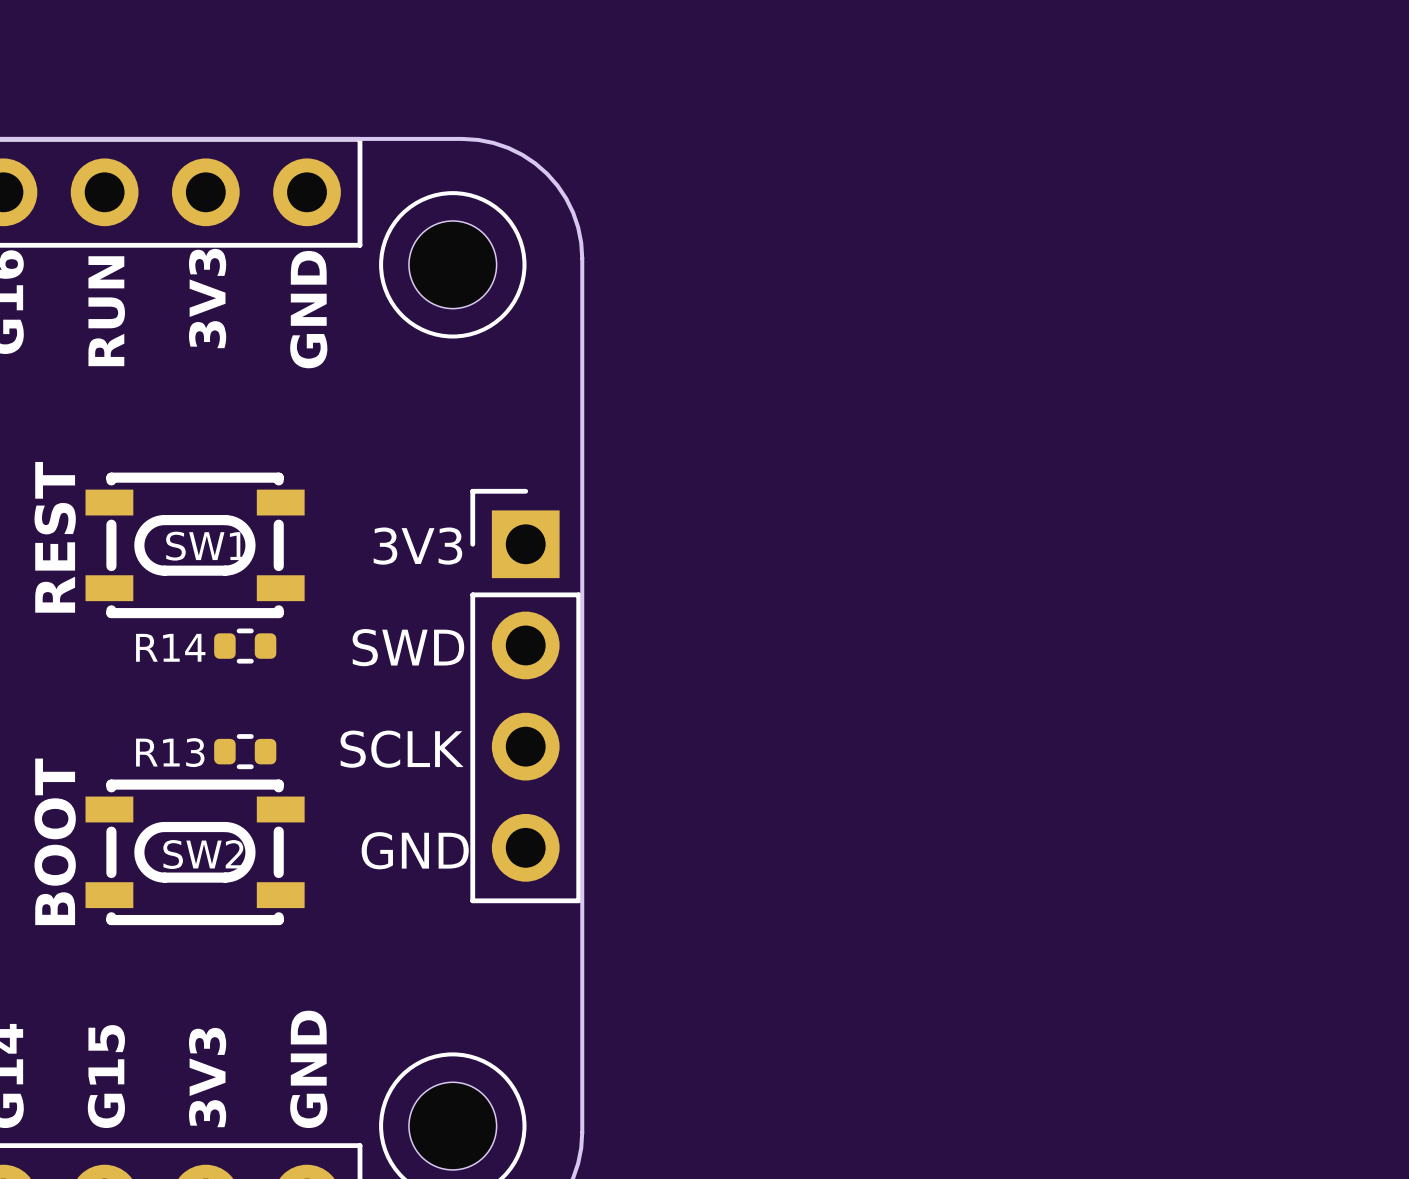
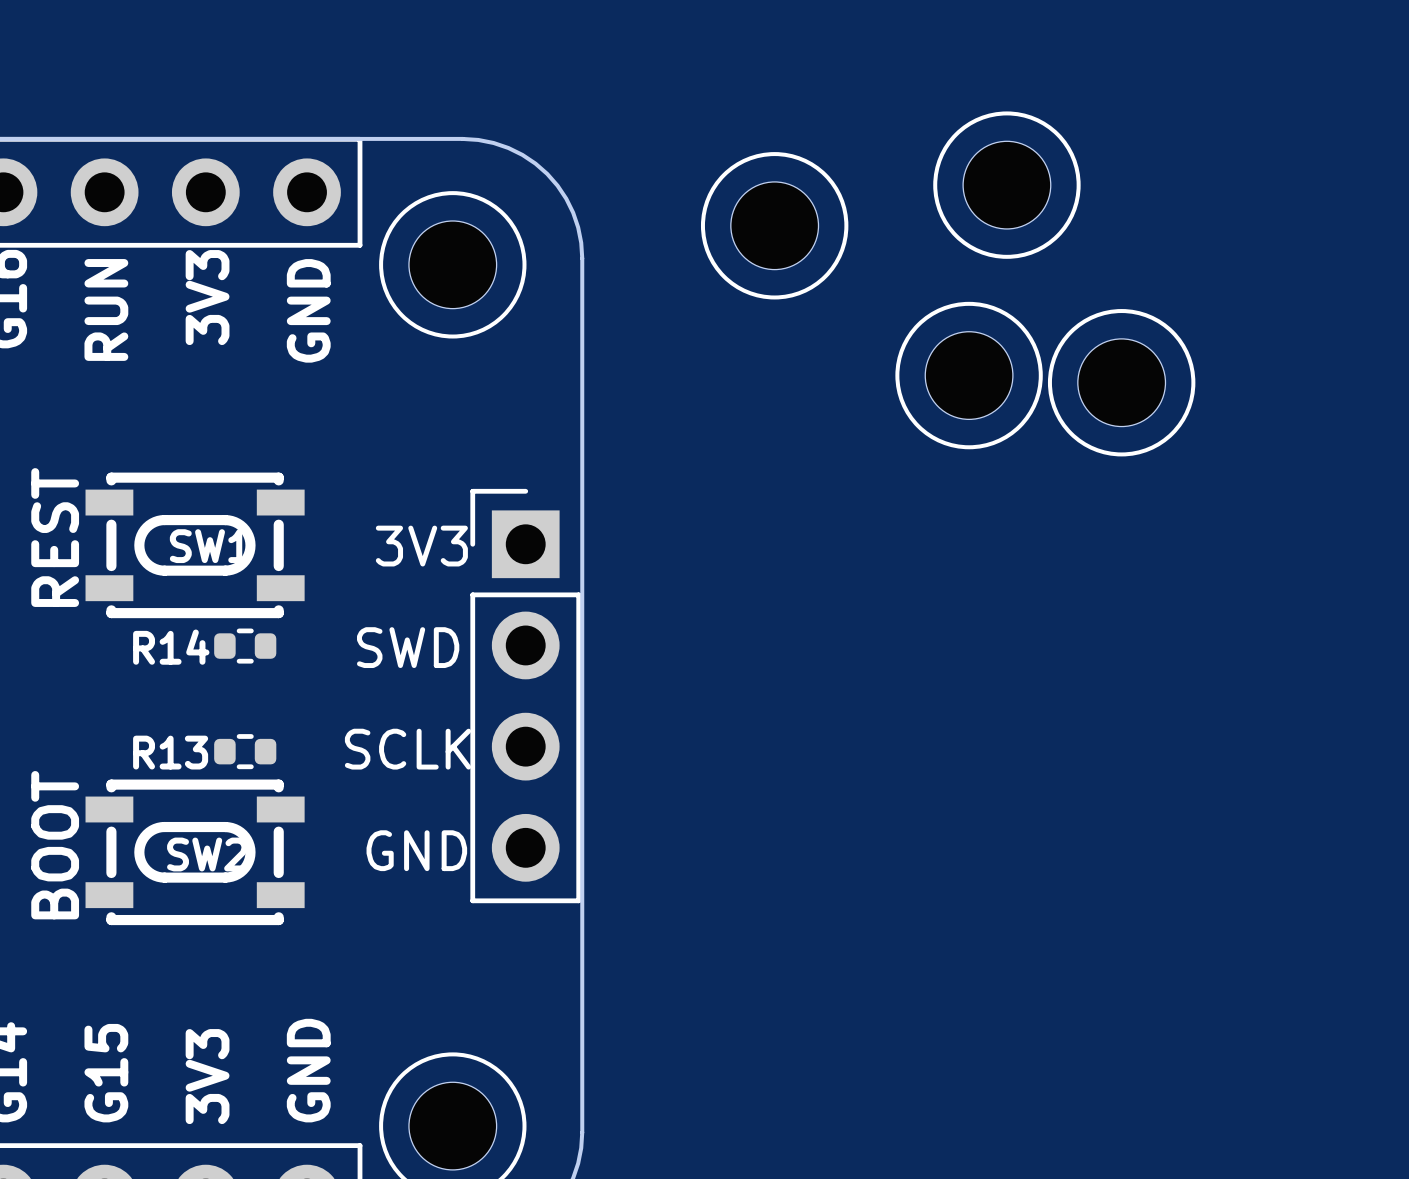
part: none -> (1006, 185)
part: none -> (774, 225)
part: none -> (969, 375)
part: none -> (1121, 382)

